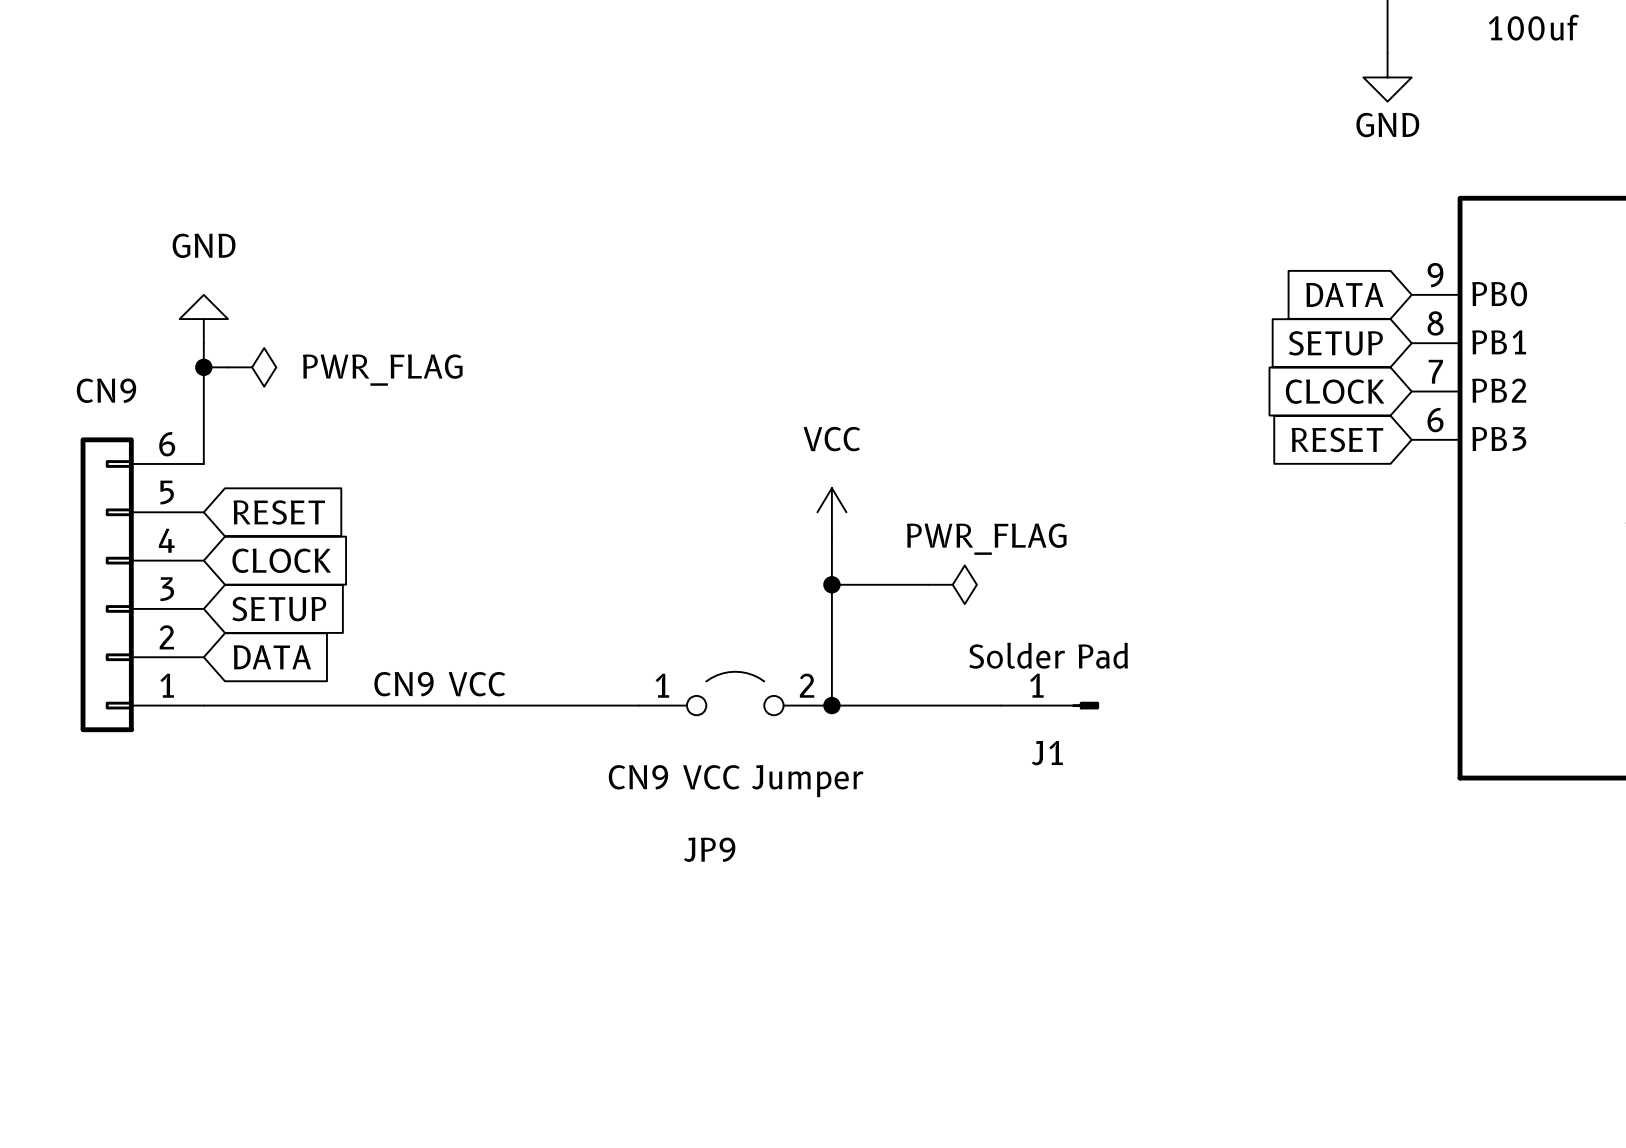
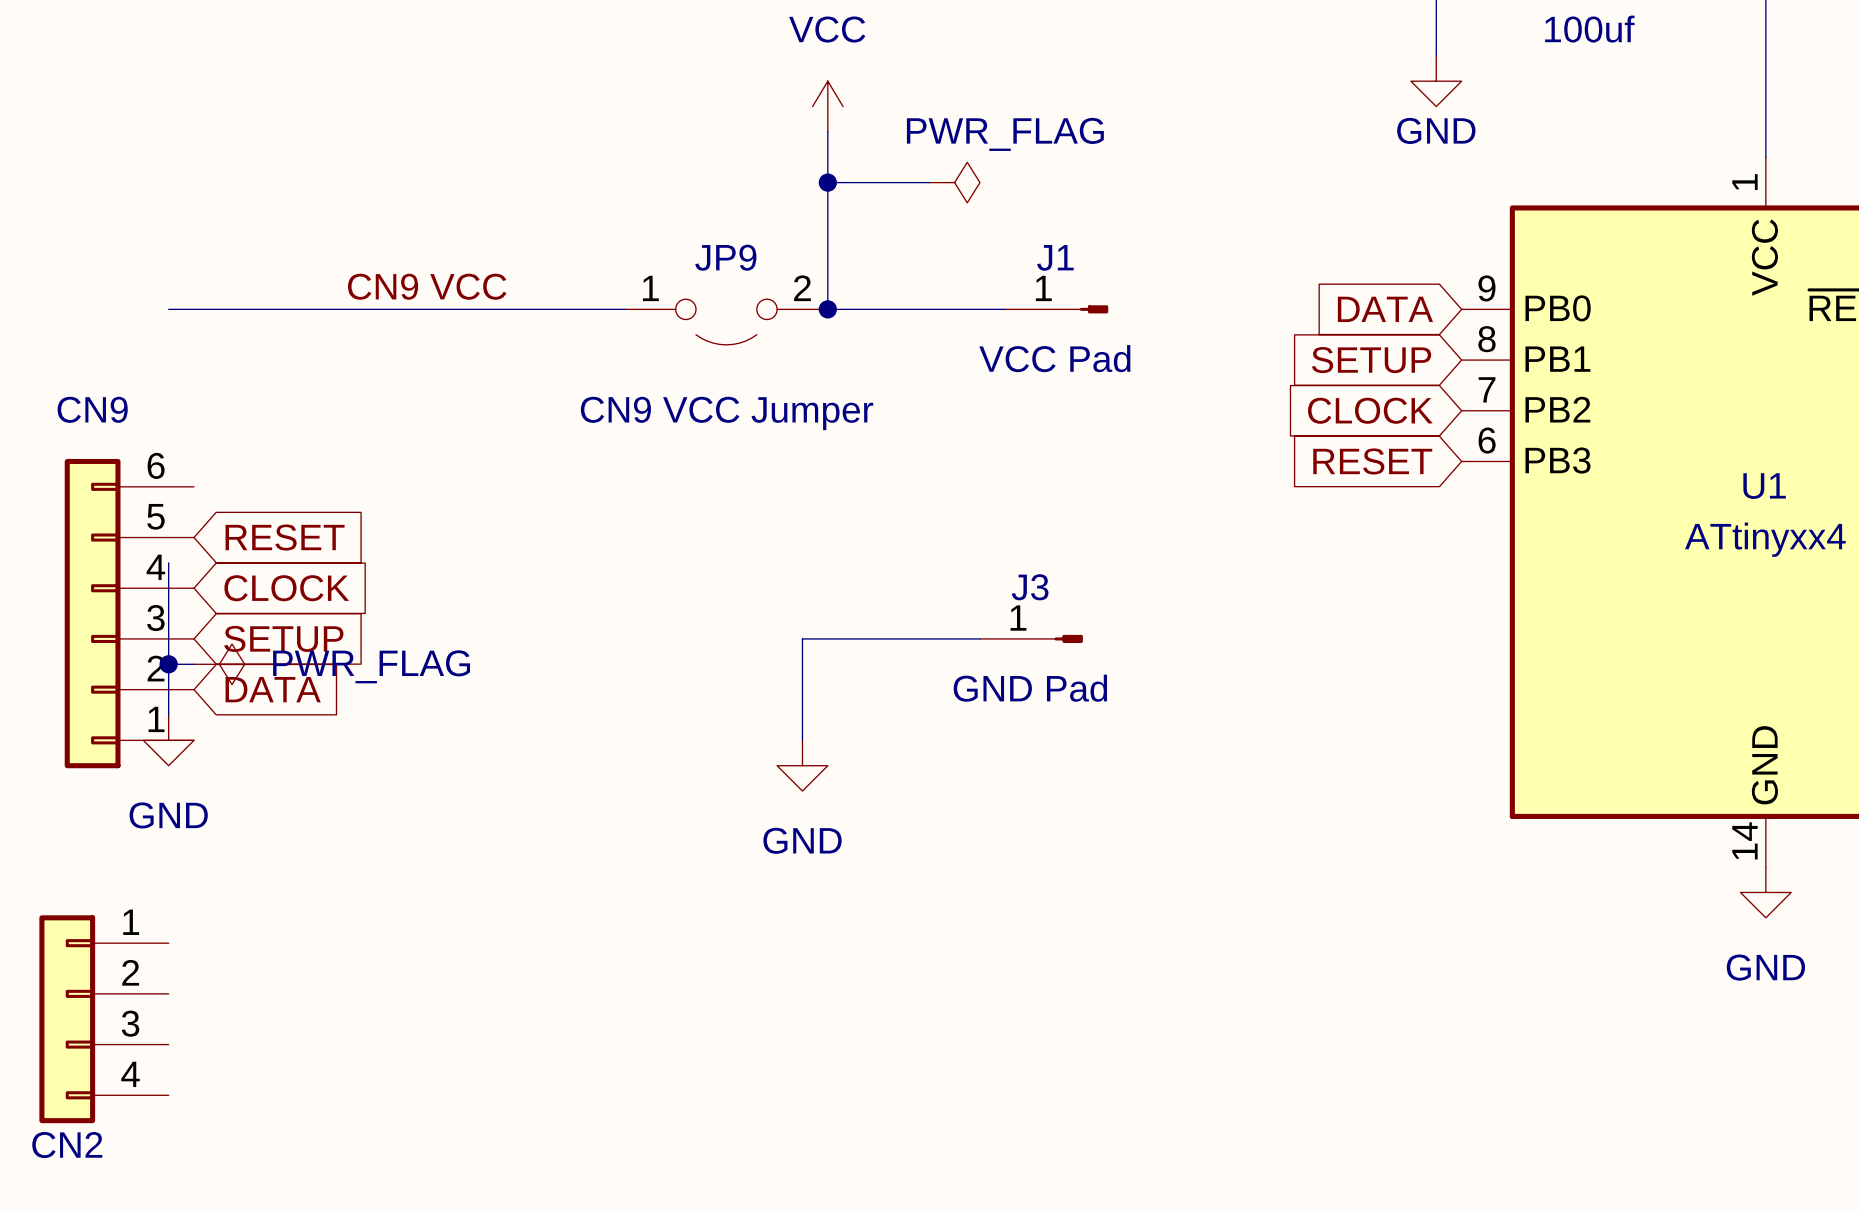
junction: none -> (827, 182)
power symbol: none -> PWR_FLAG (954, 182)
junction: none -> (827, 309)
power symbol: GND (203, 319) -> none
wire: (203, 343) (203, 463) -> none
wire: (203, 367) (227, 367) -> (168, 664) (194, 664)
junction: (203, 367) -> none
power symbol position: PWR_FLAG (252, 367) -> PWR_FLAG (219, 664)
power symbol position: VCC (831, 512) -> VCC (827, 106)
wire: none -> (168, 562) (168, 715)
wire: (831, 536) (831, 705) (1001, 705) -> (827, 131) (827, 309) (1005, 309)
wire: (831, 584) (928, 584) -> (827, 182) (929, 182)
junction: (831, 584) -> none
power symbol: PWR_FLAG (952, 584) -> none
wire: none -> (979, 638) (802, 638) (802, 740)
J3: none -> GND Pad (1031, 638)
junction: none -> (168, 664)
J1 value: Solder Pad (1048, 655) -> VCC Pad (1054, 358)
label position: CN9 VCC (439, 684) -> CN9 VCC (427, 286)
JP9 flip: as is (735, 693) -> up-down (726, 322)
JP9 position: (735, 693) -> (726, 322)
power symbol: none -> GND (168, 740)
wire: (203, 705) (638, 705) -> (168, 309) (625, 309)
junction: (831, 705) -> none
J1 position: (1050, 705) -> (1056, 309)
power symbol: none -> GND (802, 765)
J1 name position: J1 (1047, 753) -> J1 (1055, 257)
JP9 name position: JP9 (709, 849) -> JP9 (725, 257)
part: none -> CN2 (104, 1019)

